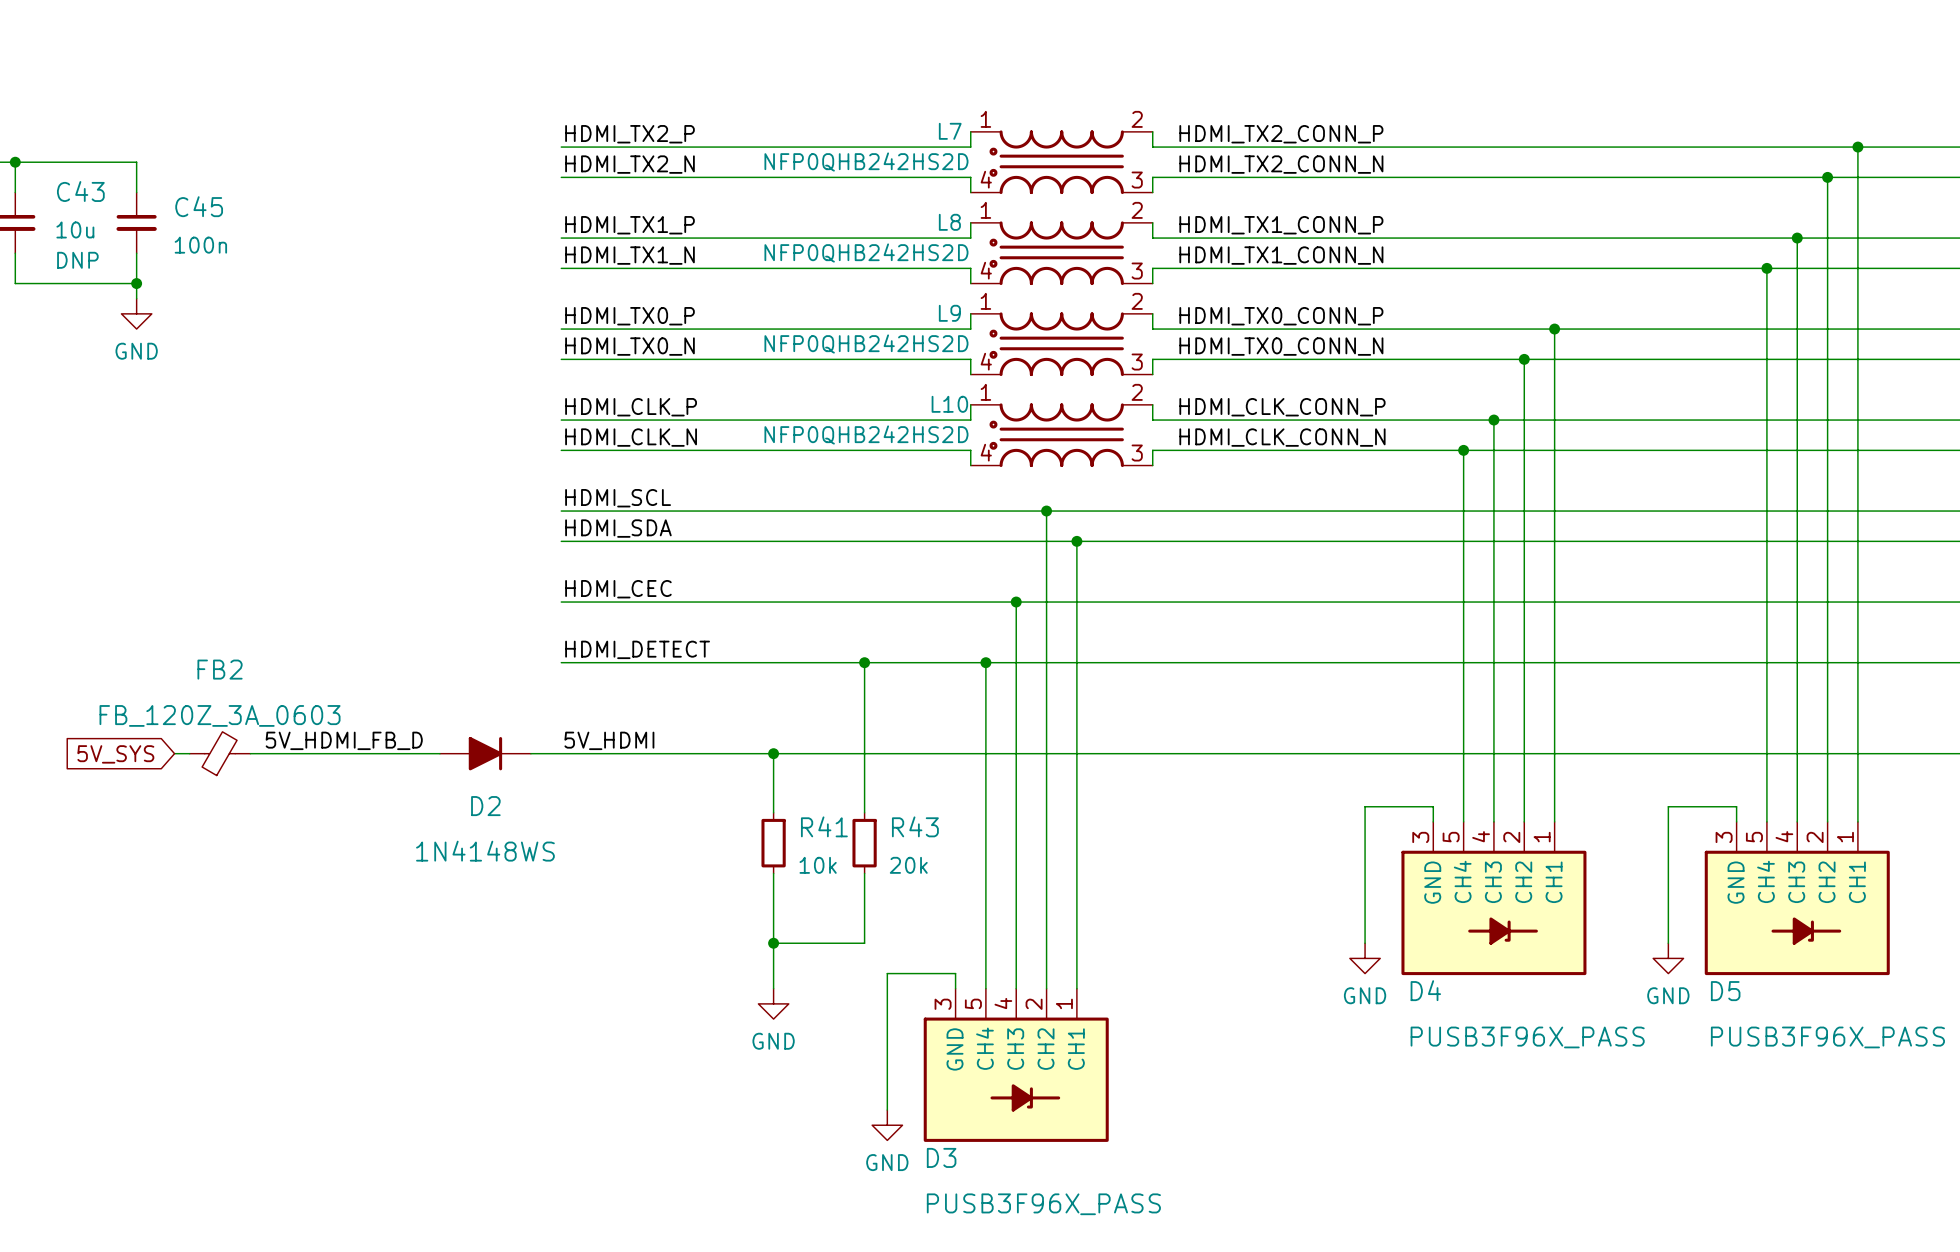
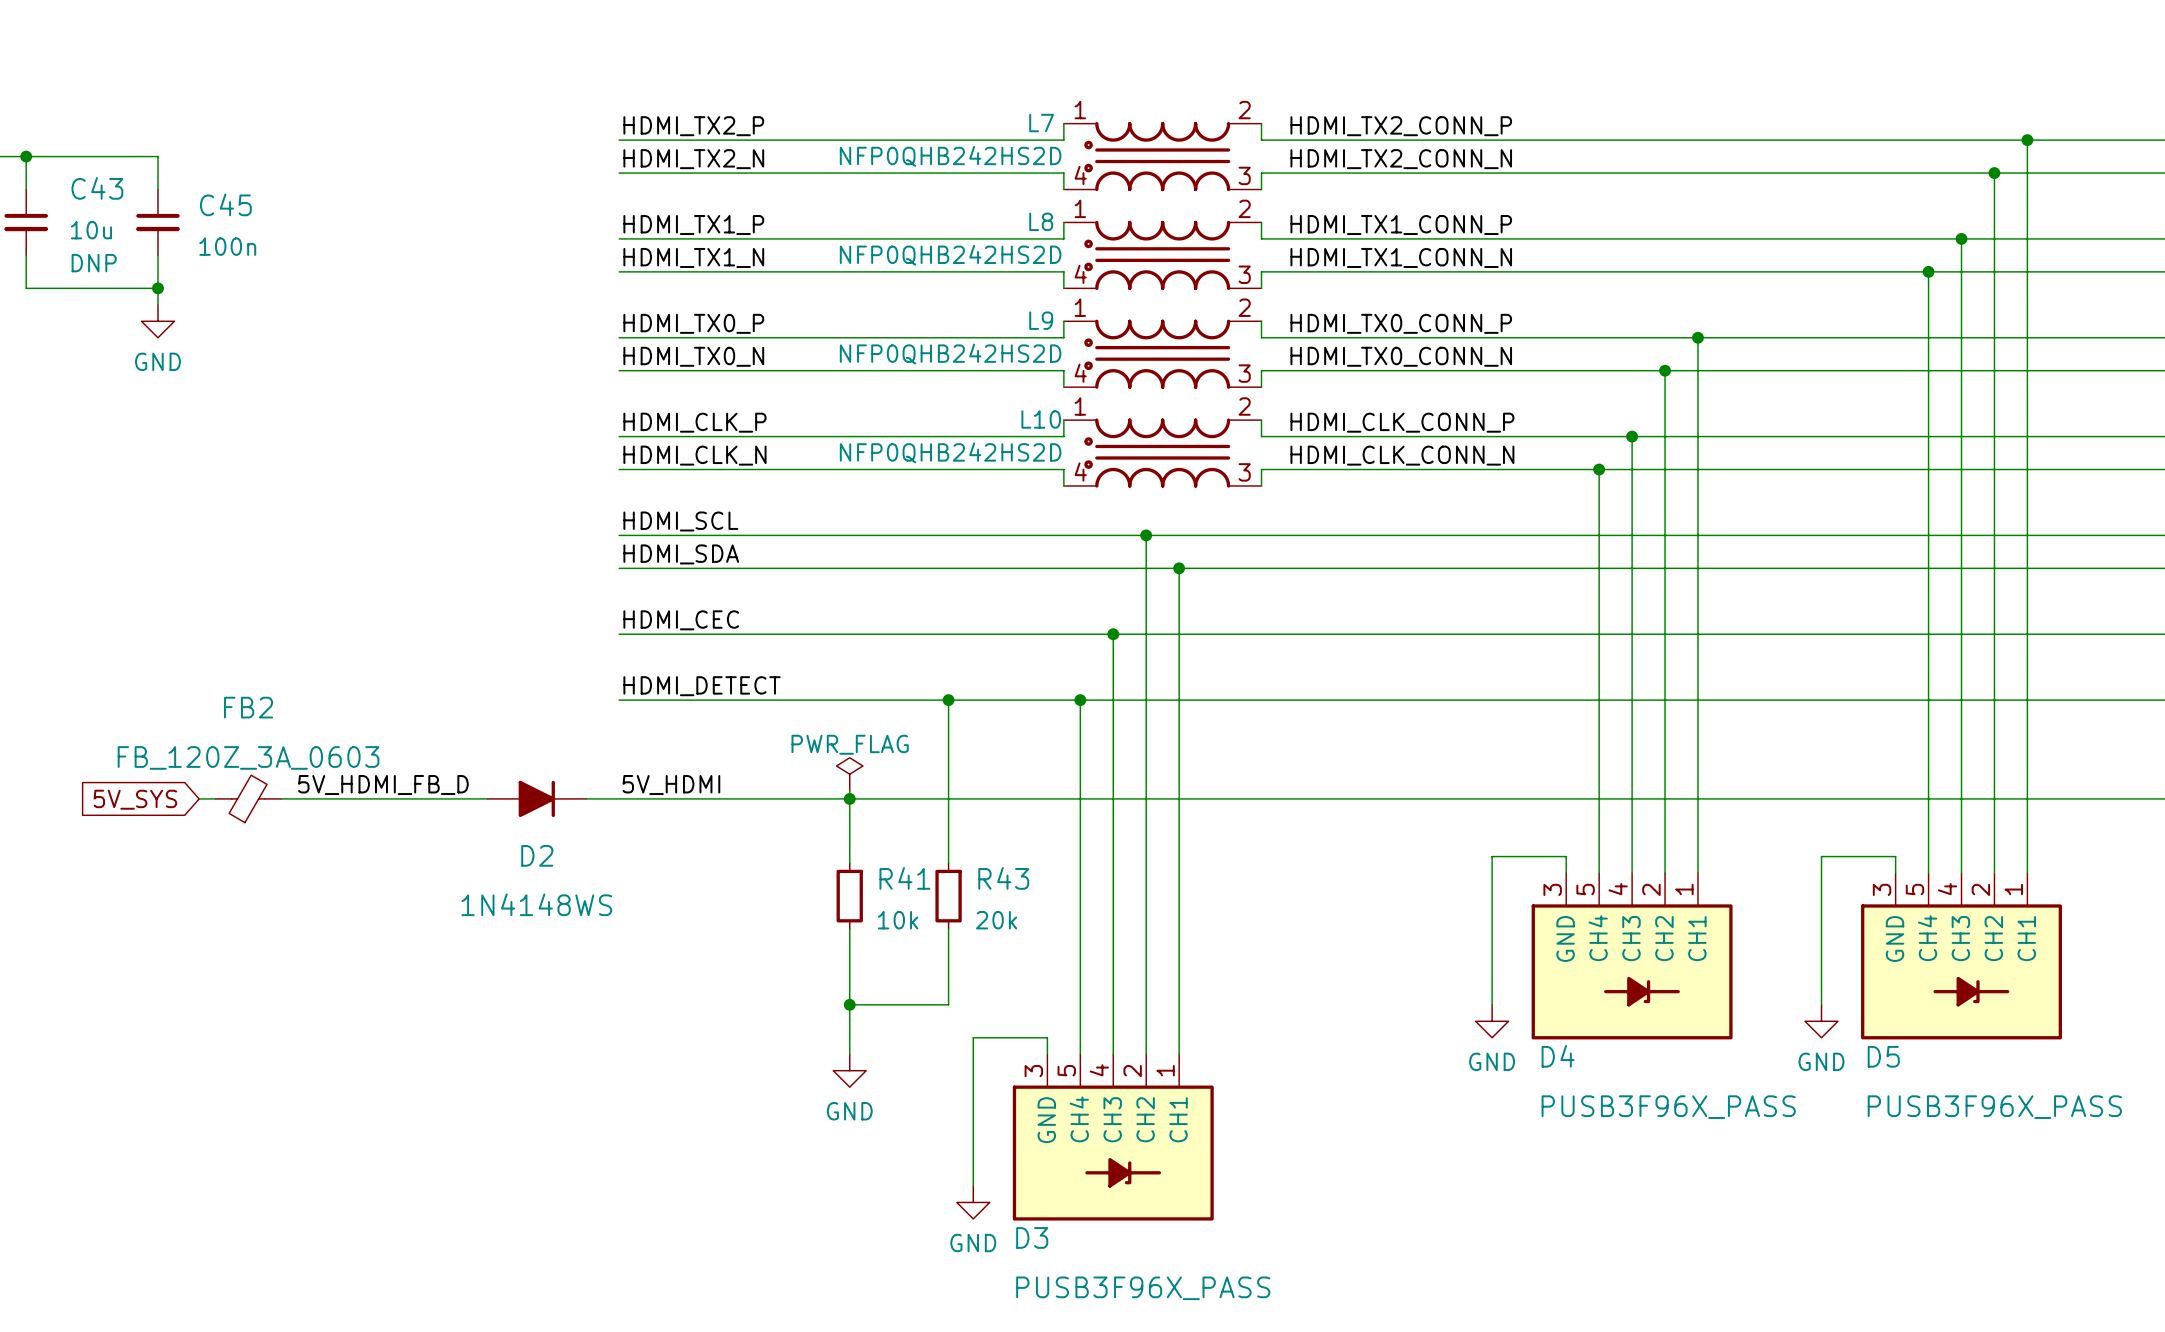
power symbol: none -> PWR_FLAG (849, 774)

